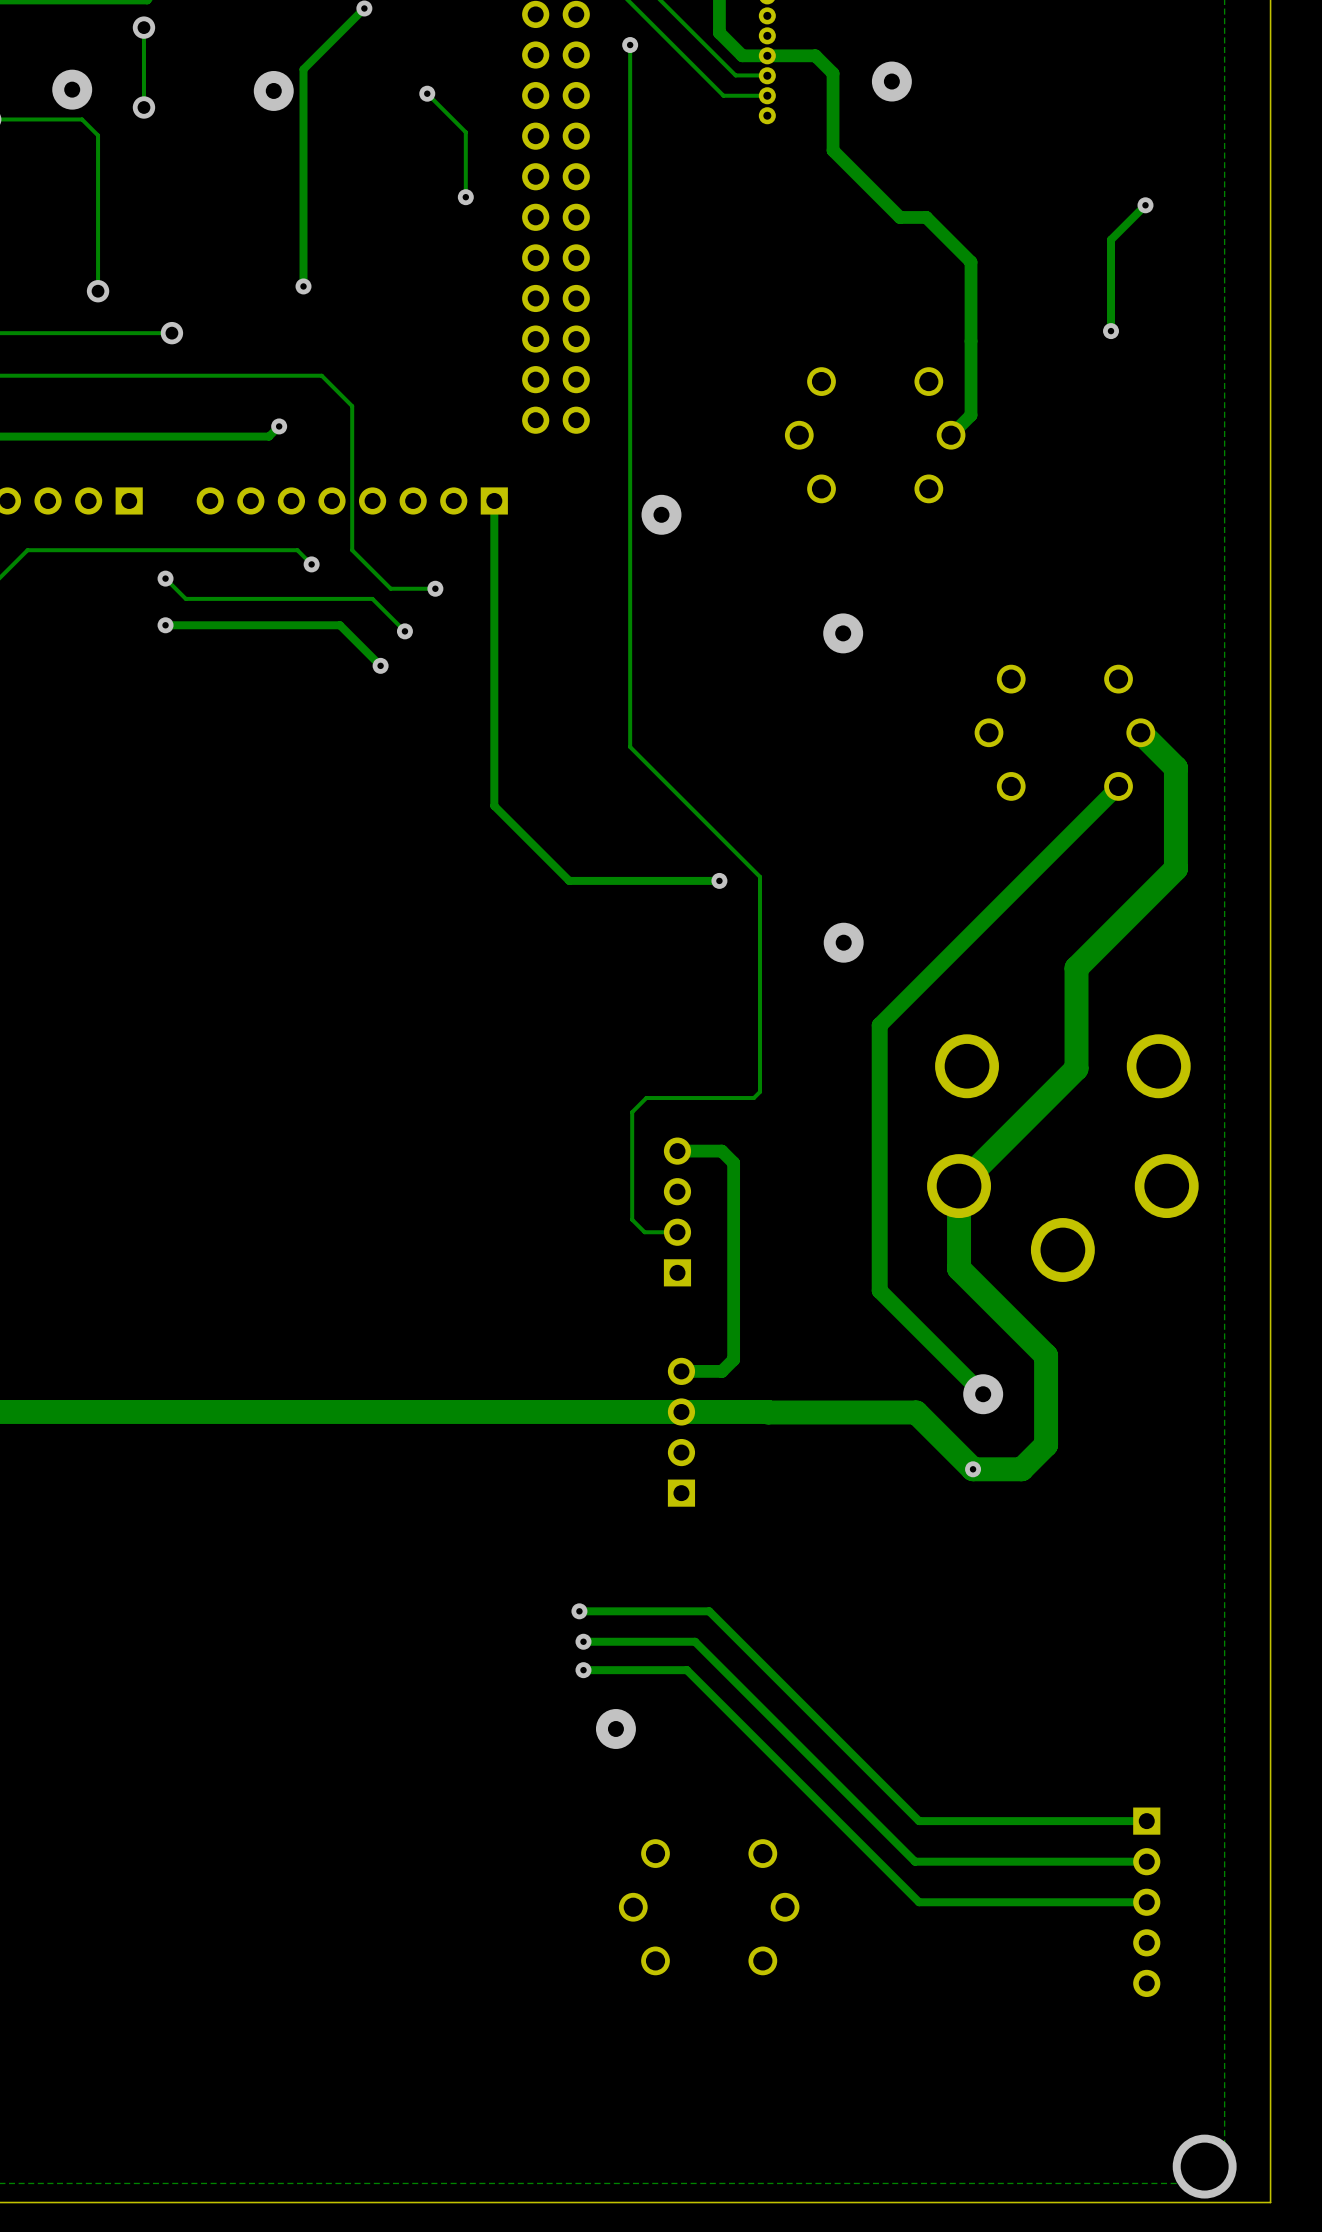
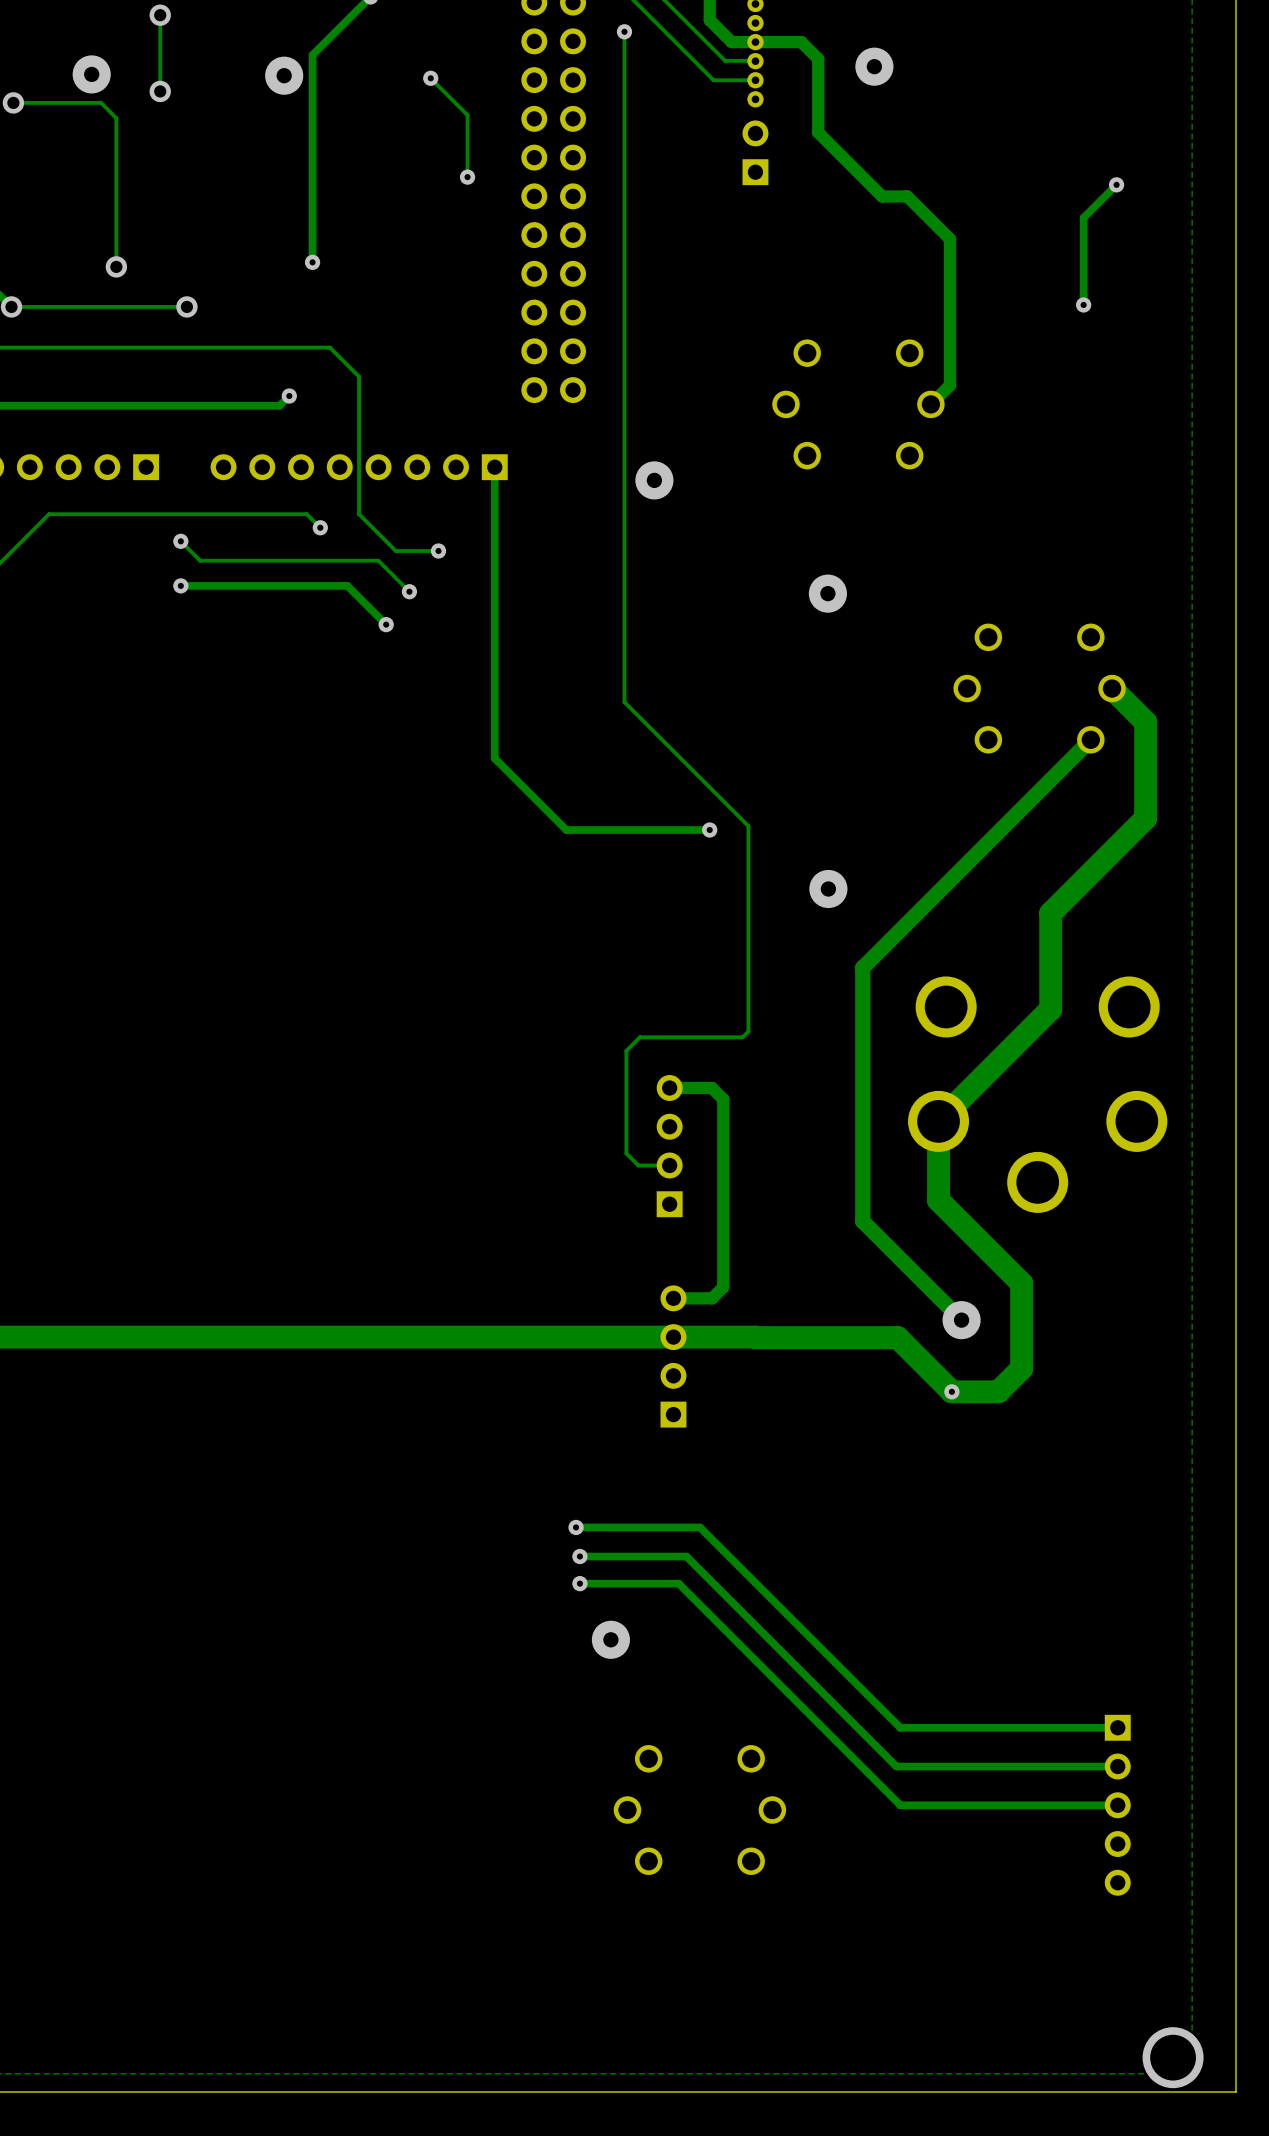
part: none -> (755, 152)

